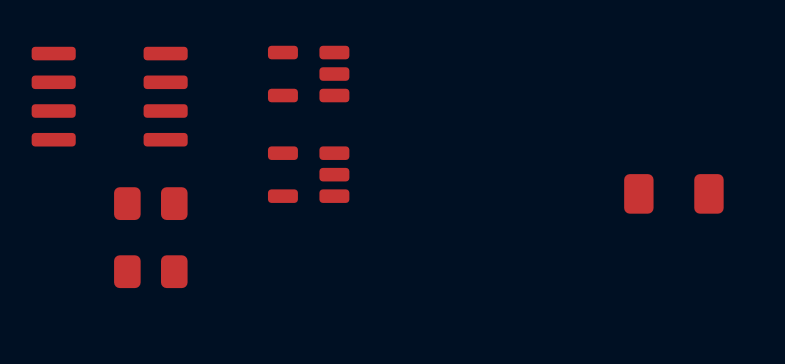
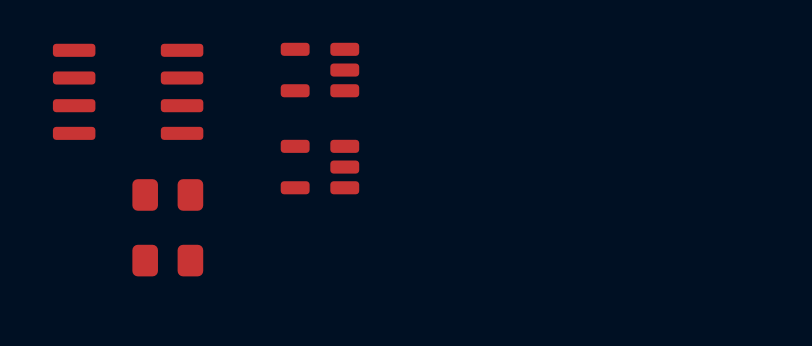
part: (673, 193) -> none

